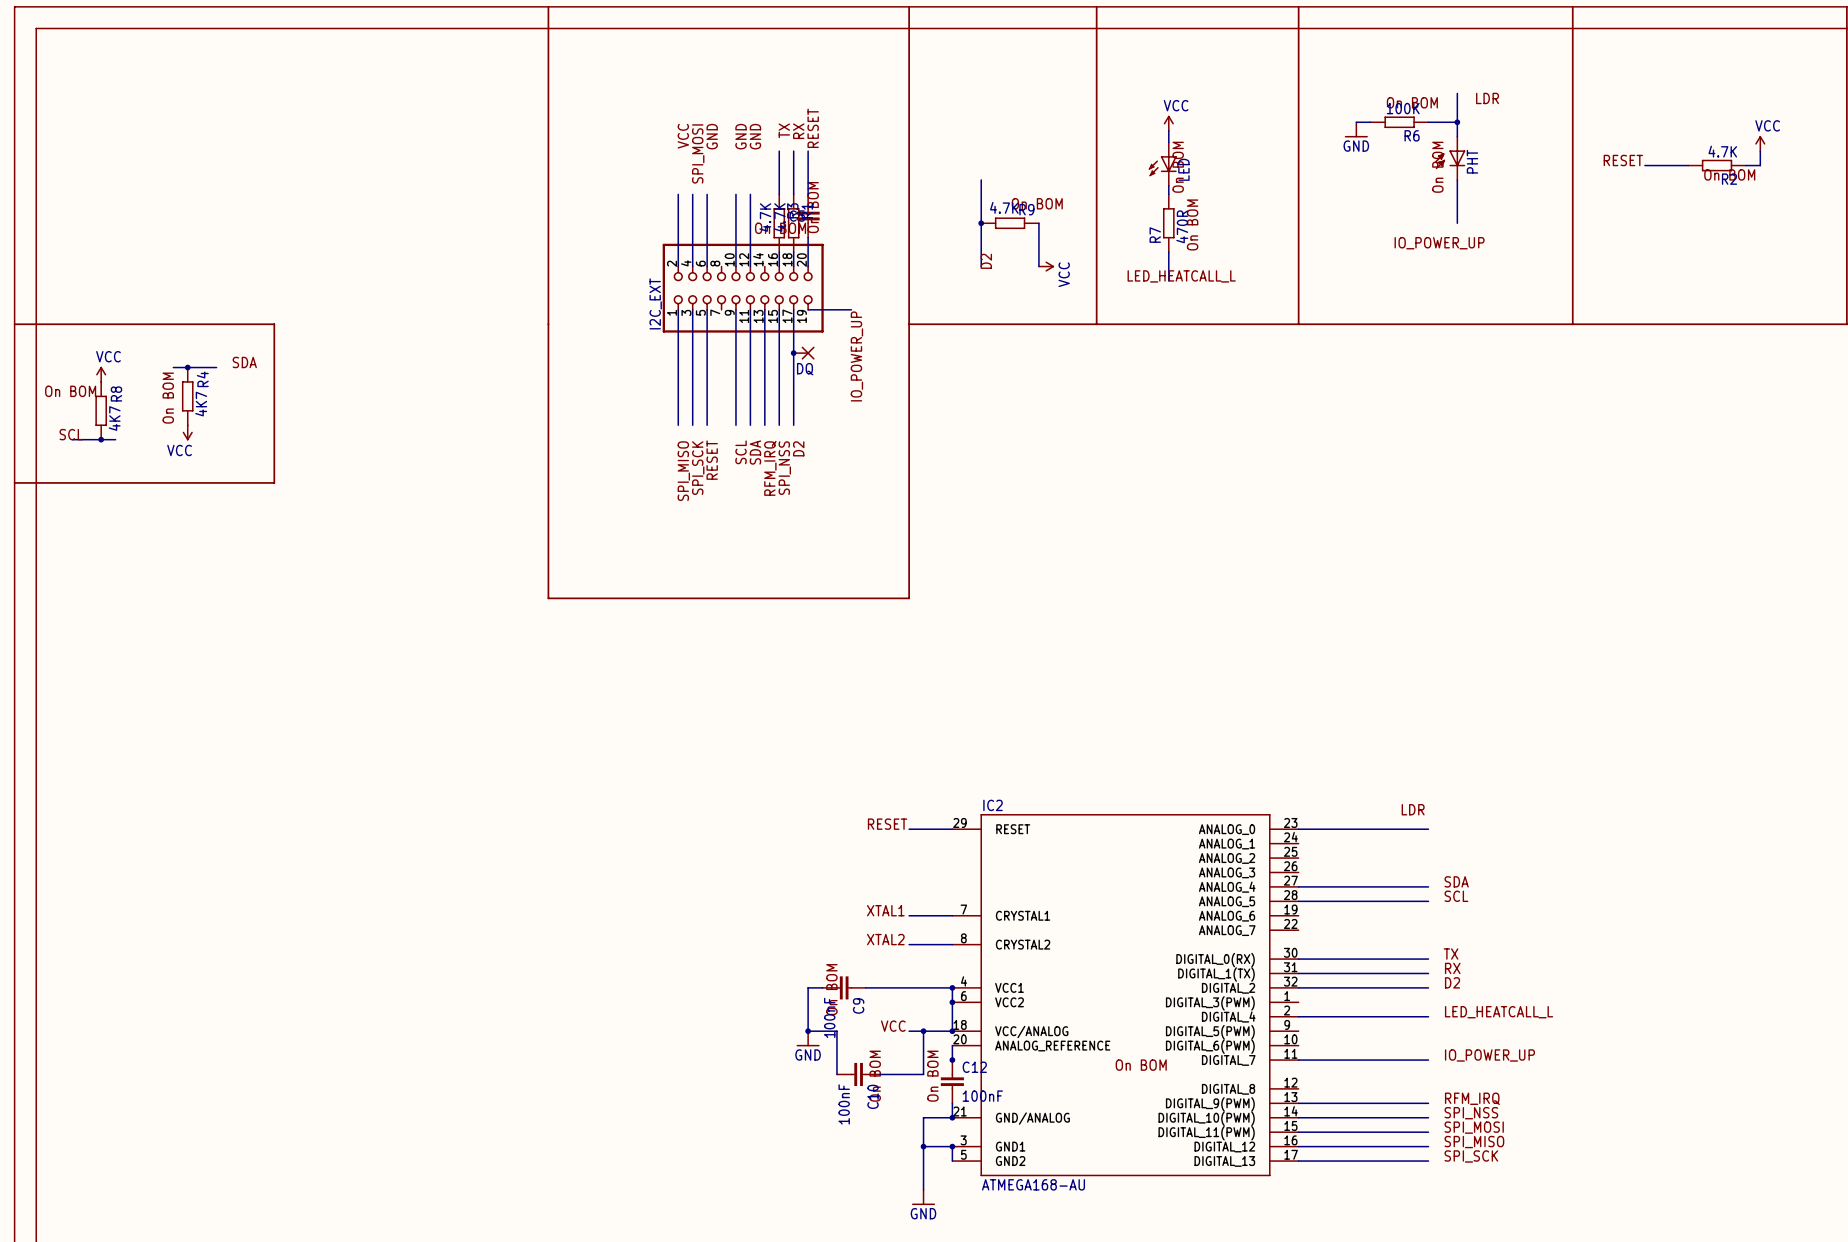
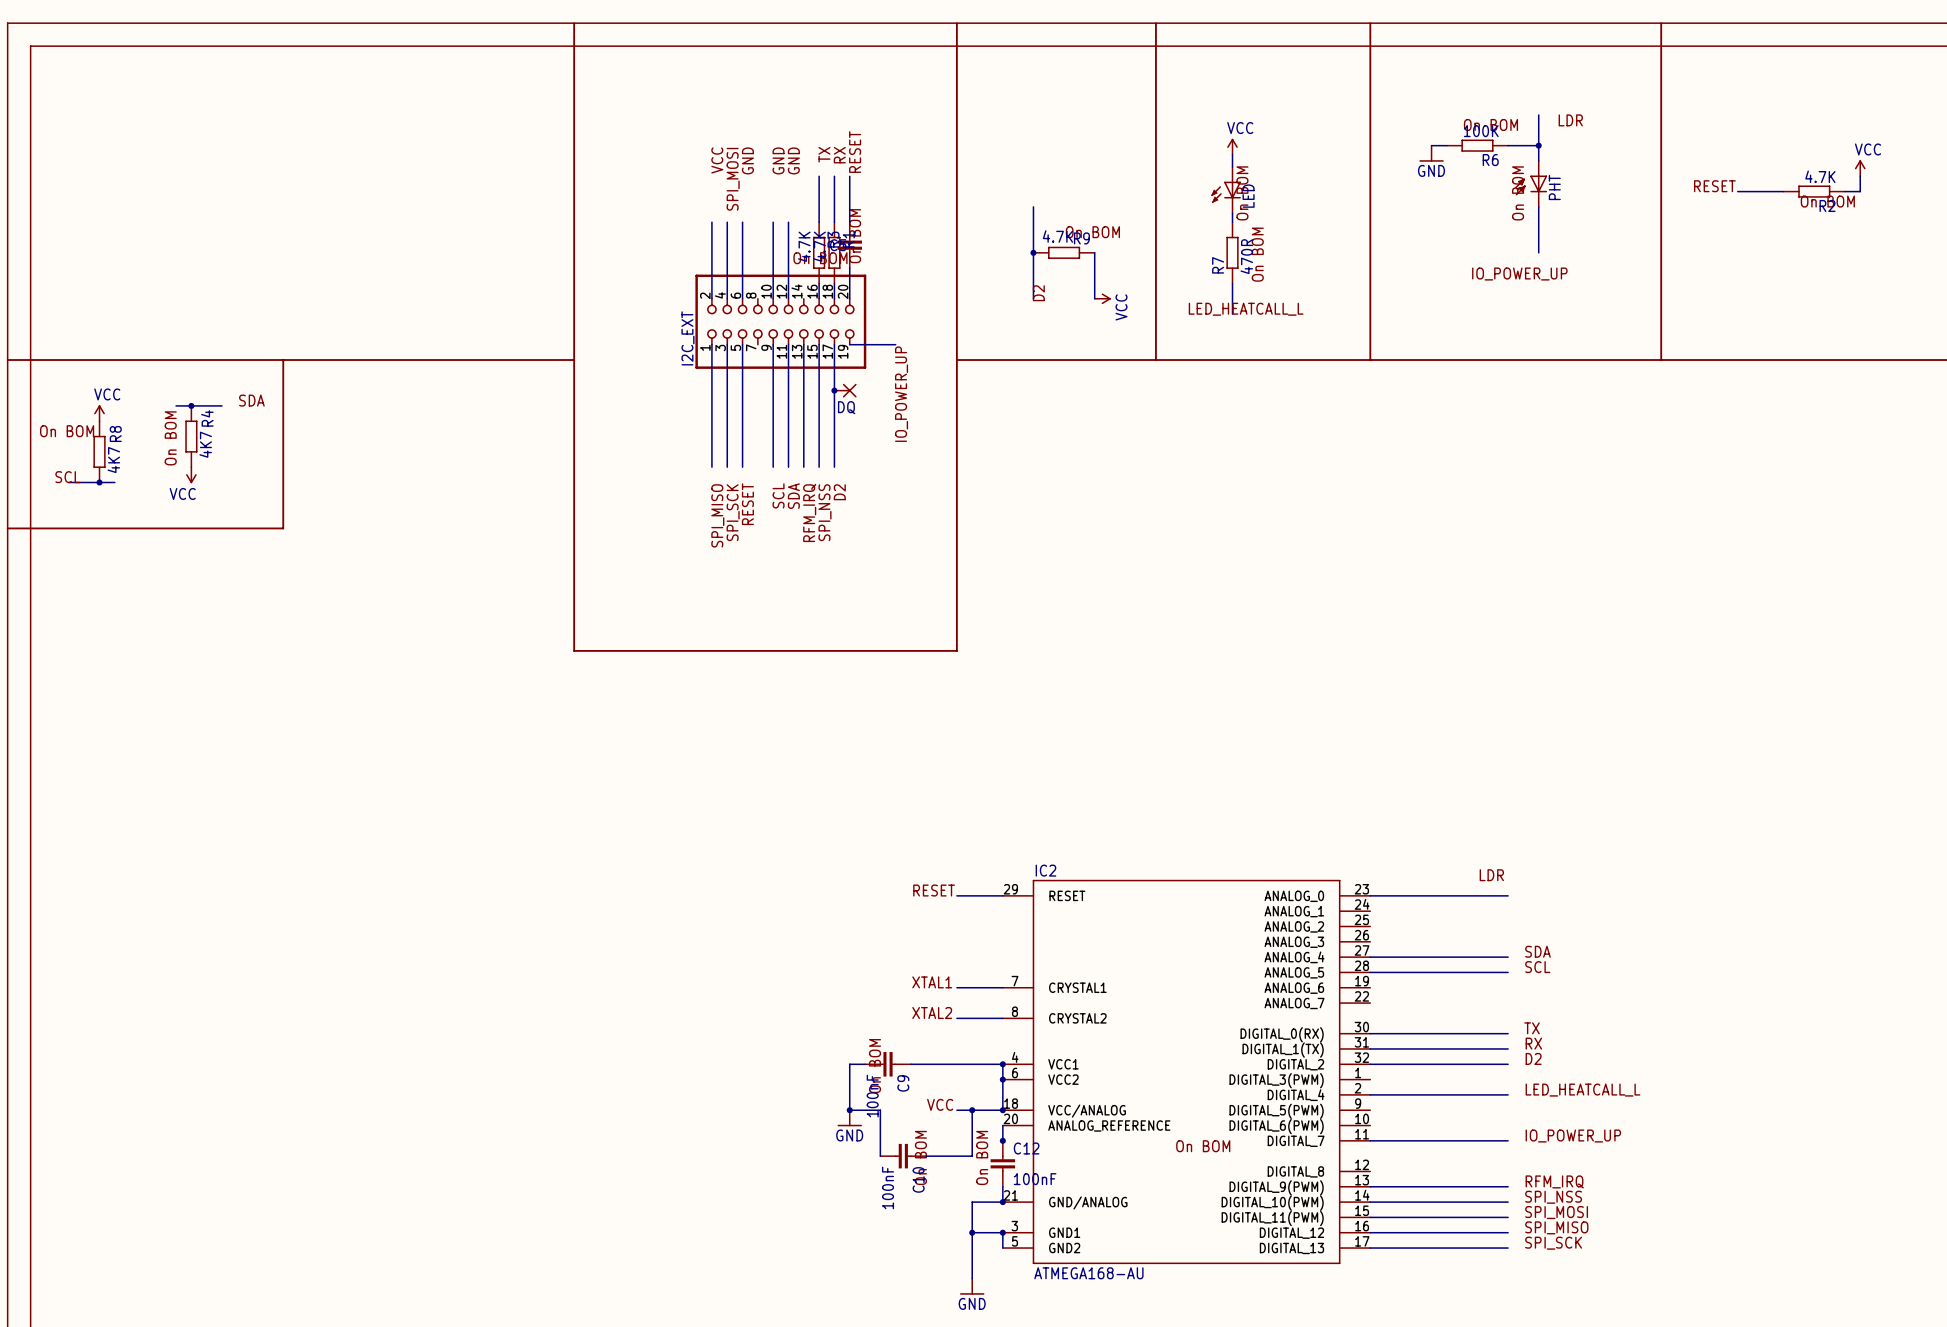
line: none -> (283, 360) (574, 360)

